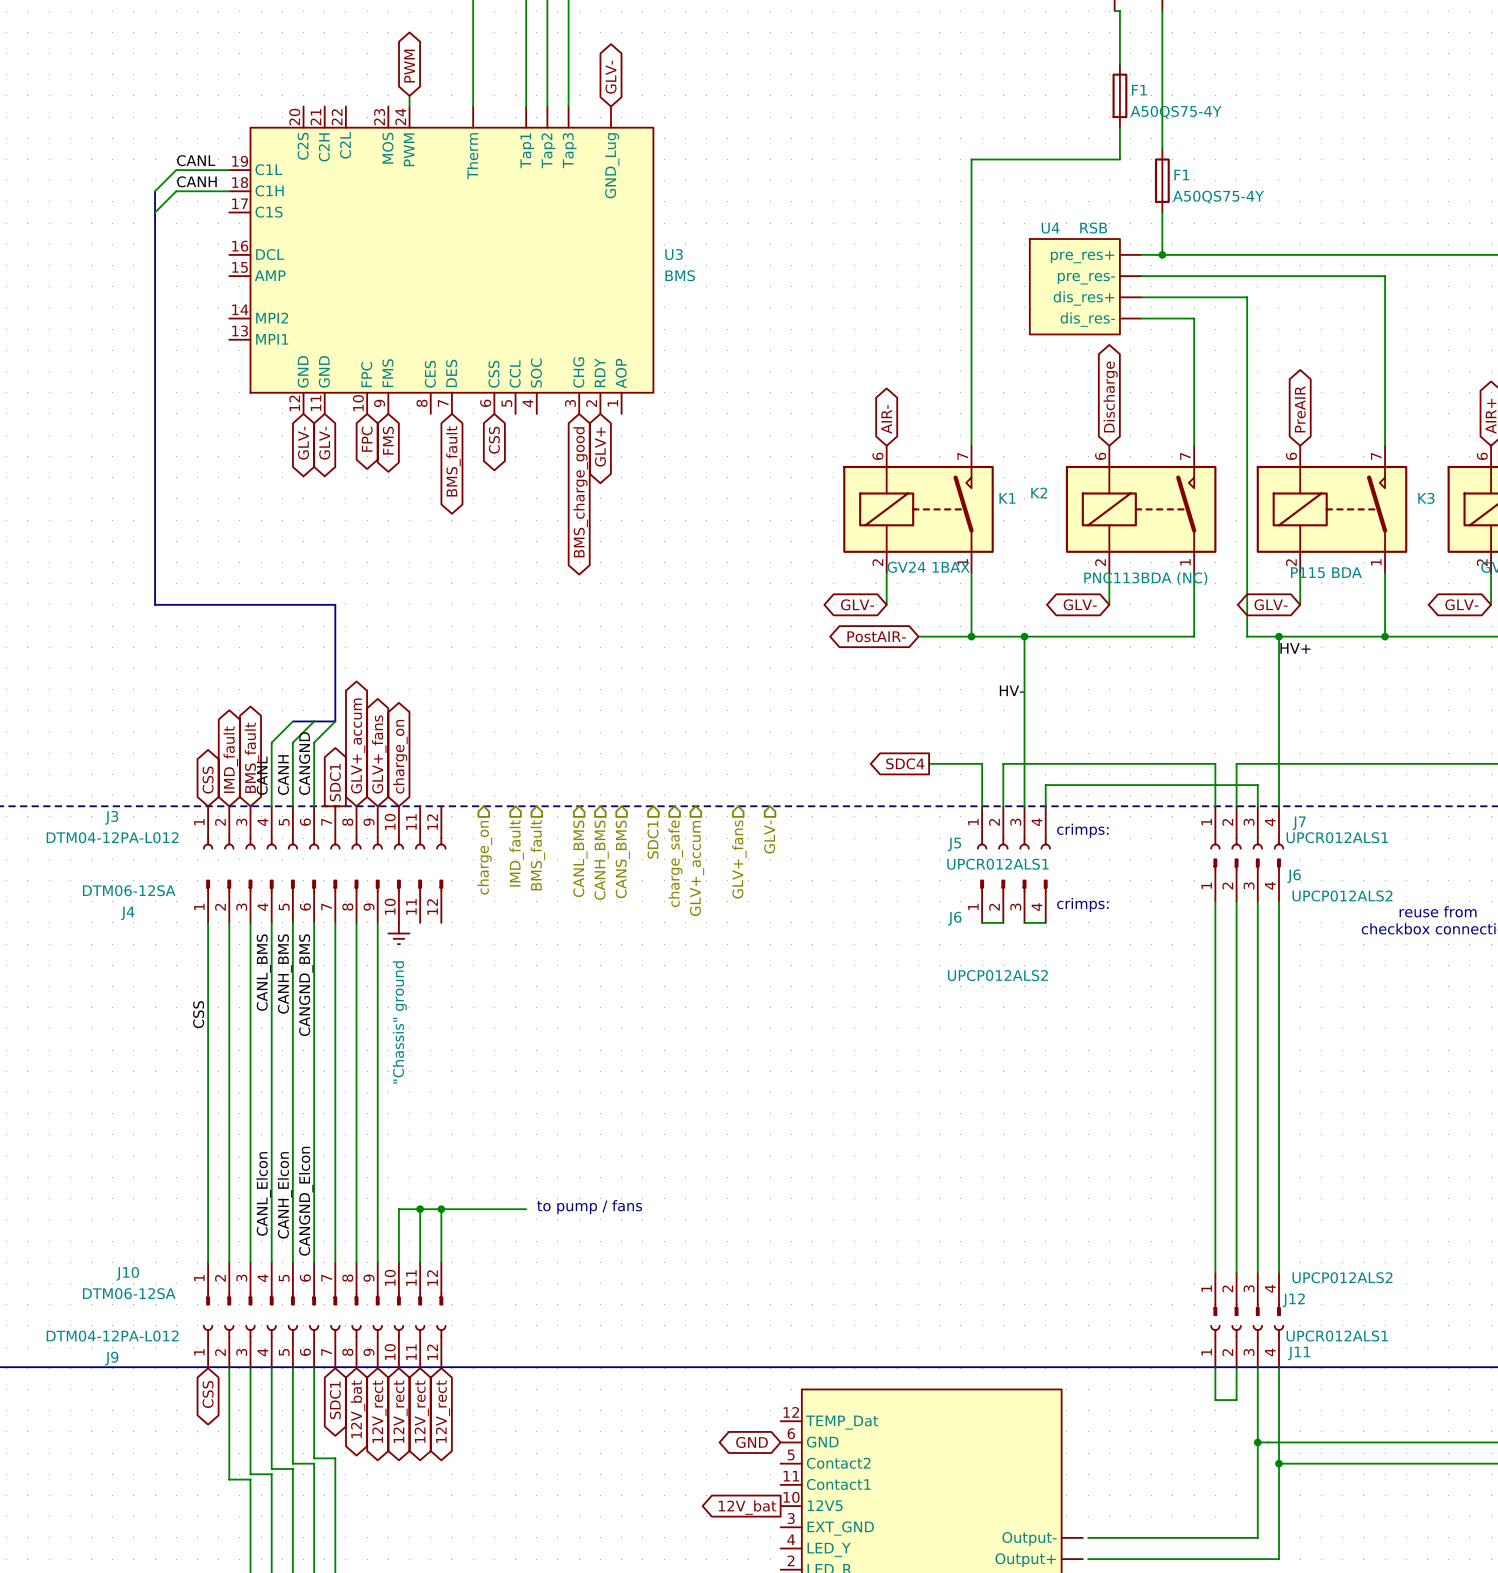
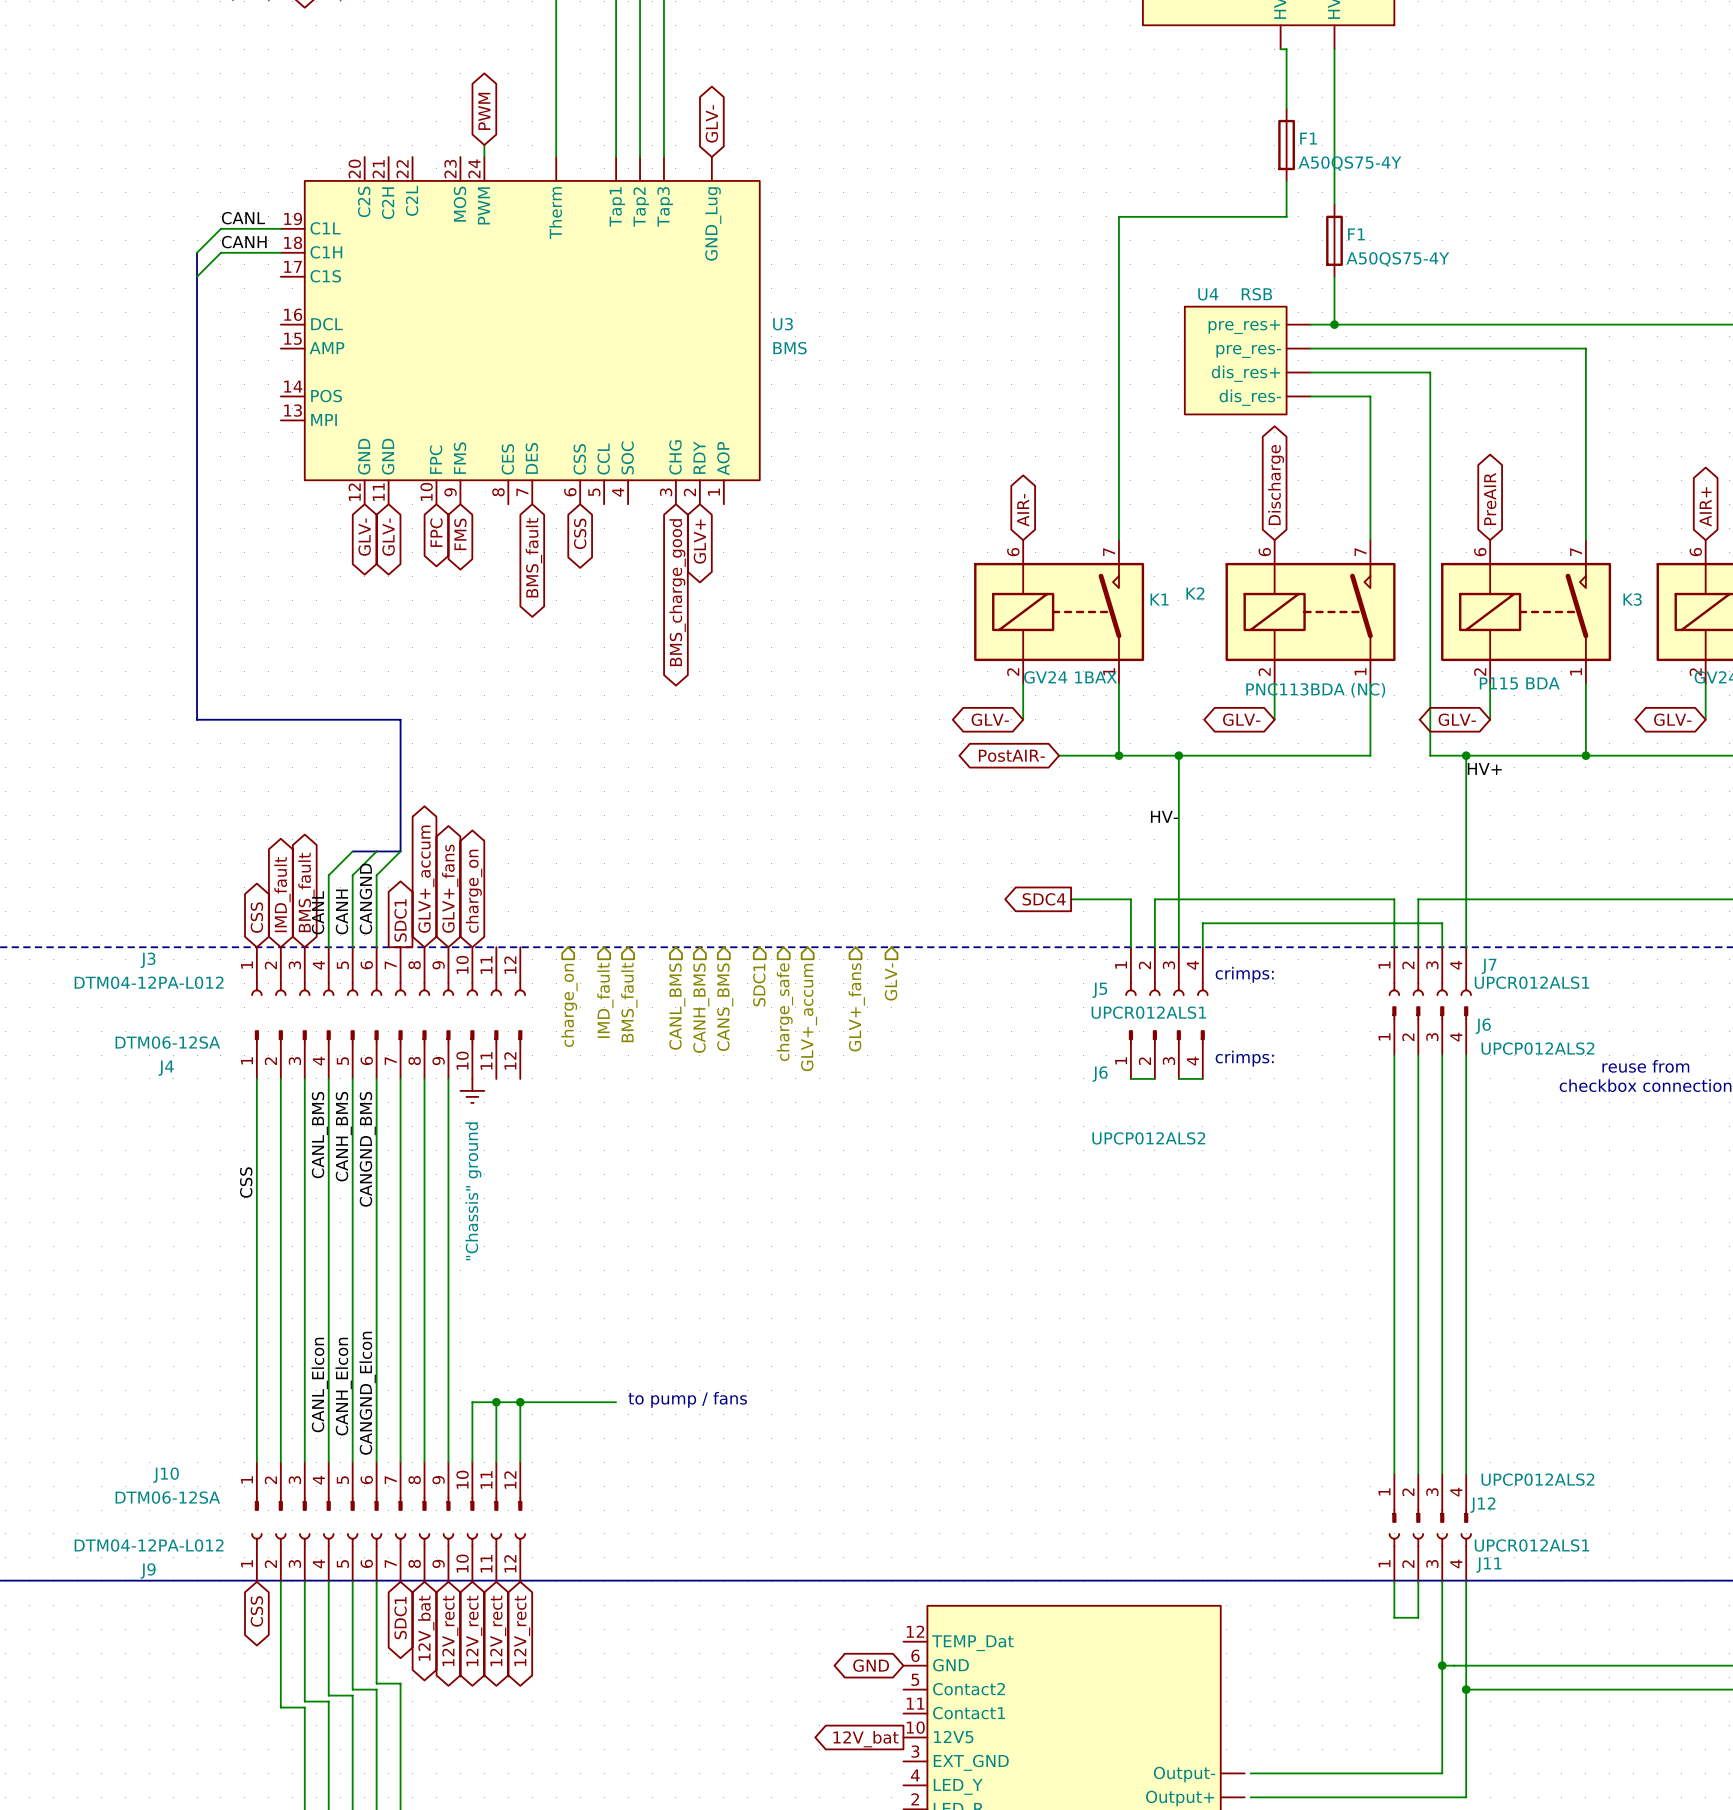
U3 pin name: MPI2 (272, 318) -> POS (326, 396)
U3 pin name: MPI1 (272, 339) -> MPI (324, 419)

